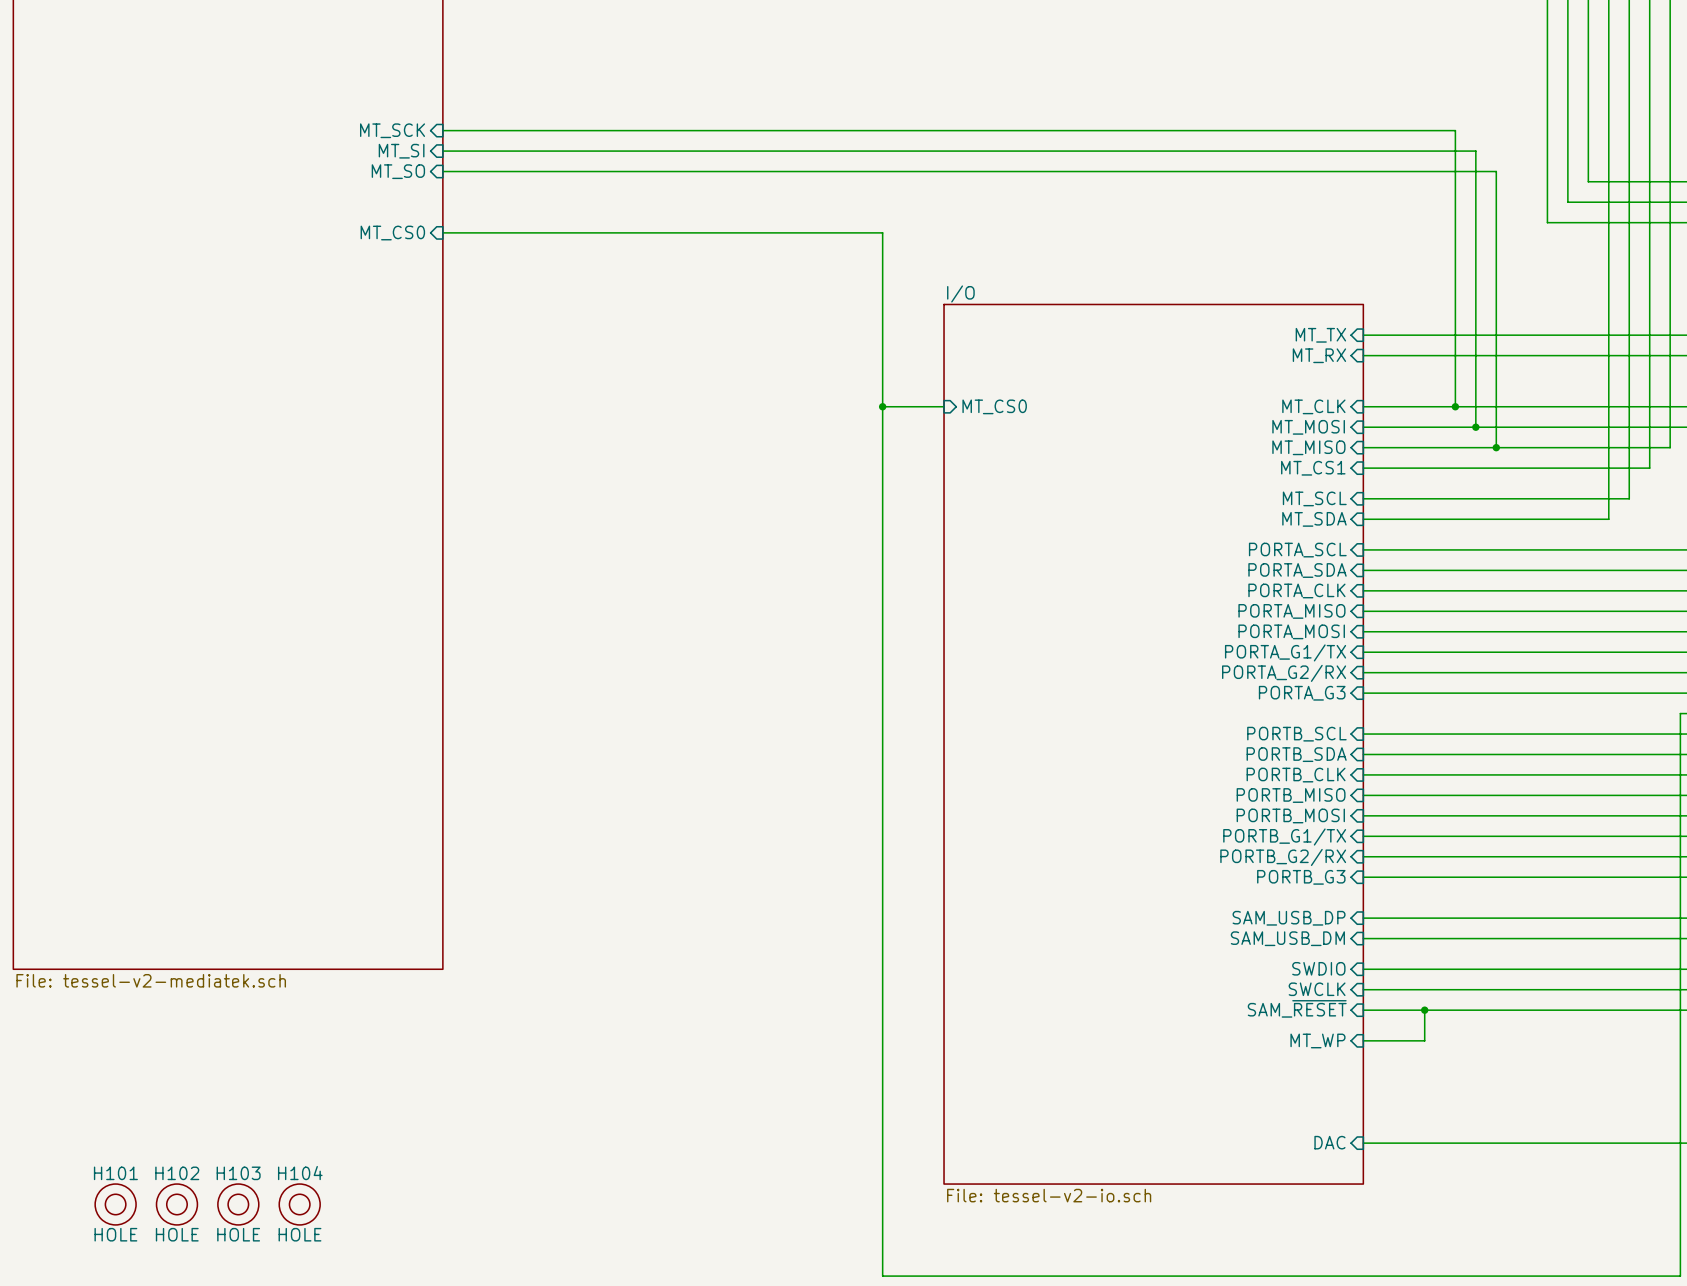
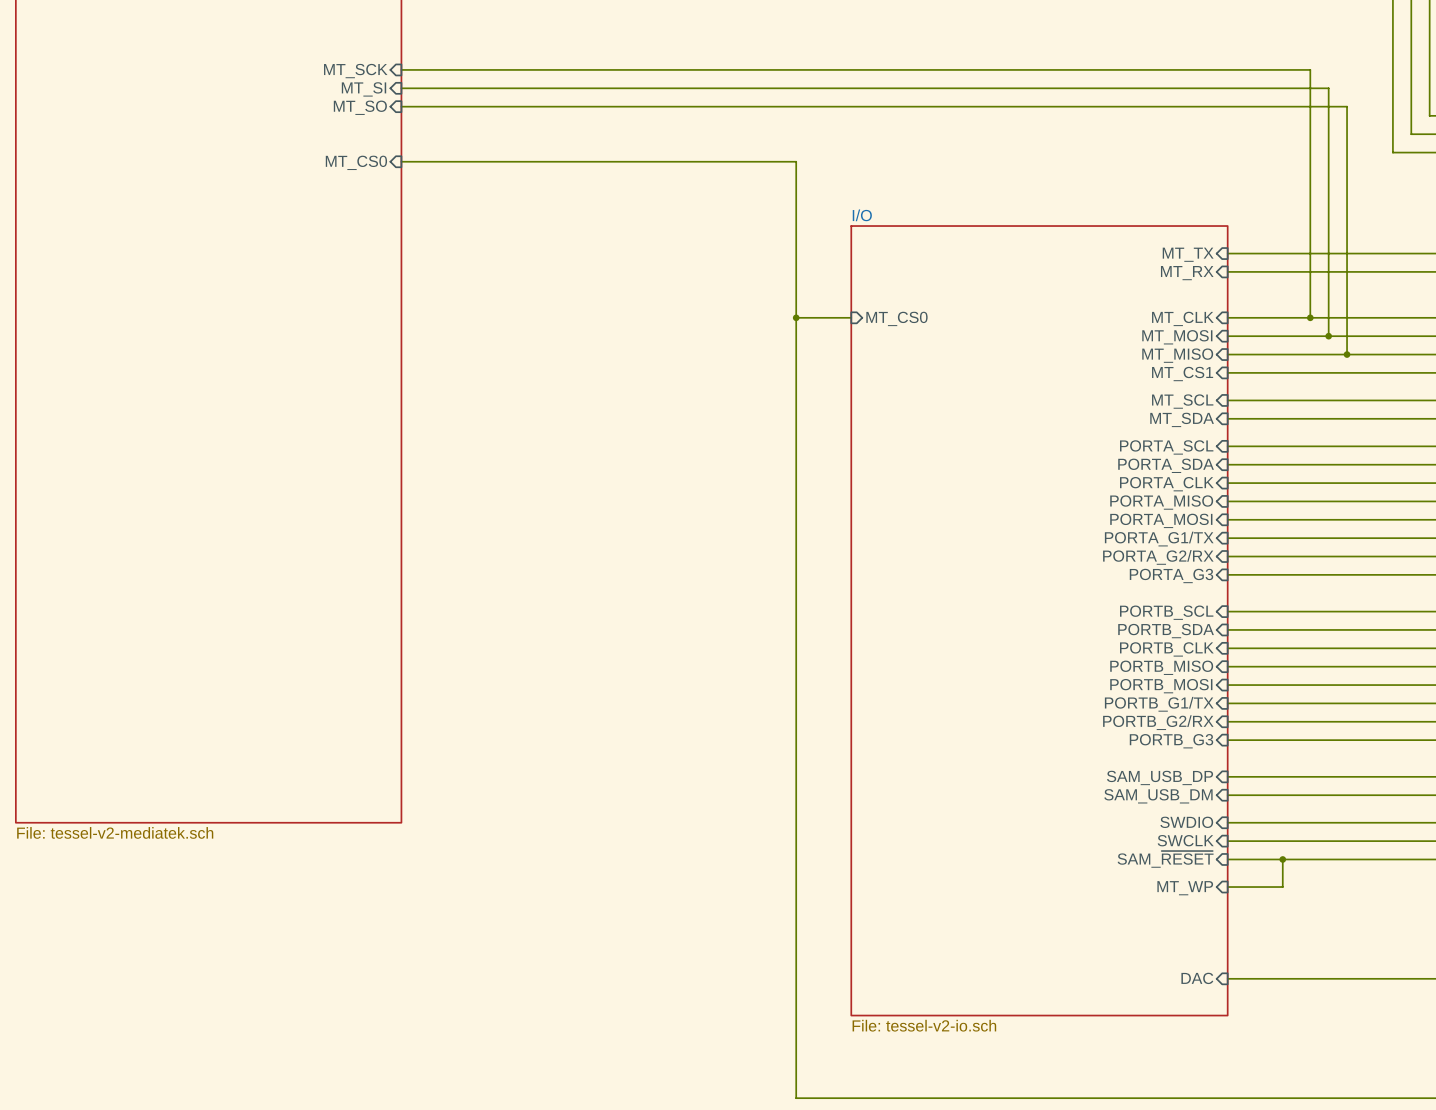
H101: HOLE (115, 1204) -> none
H102: HOLE (176, 1204) -> none
H103: HOLE (238, 1204) -> none
H104: HOLE (299, 1204) -> none

